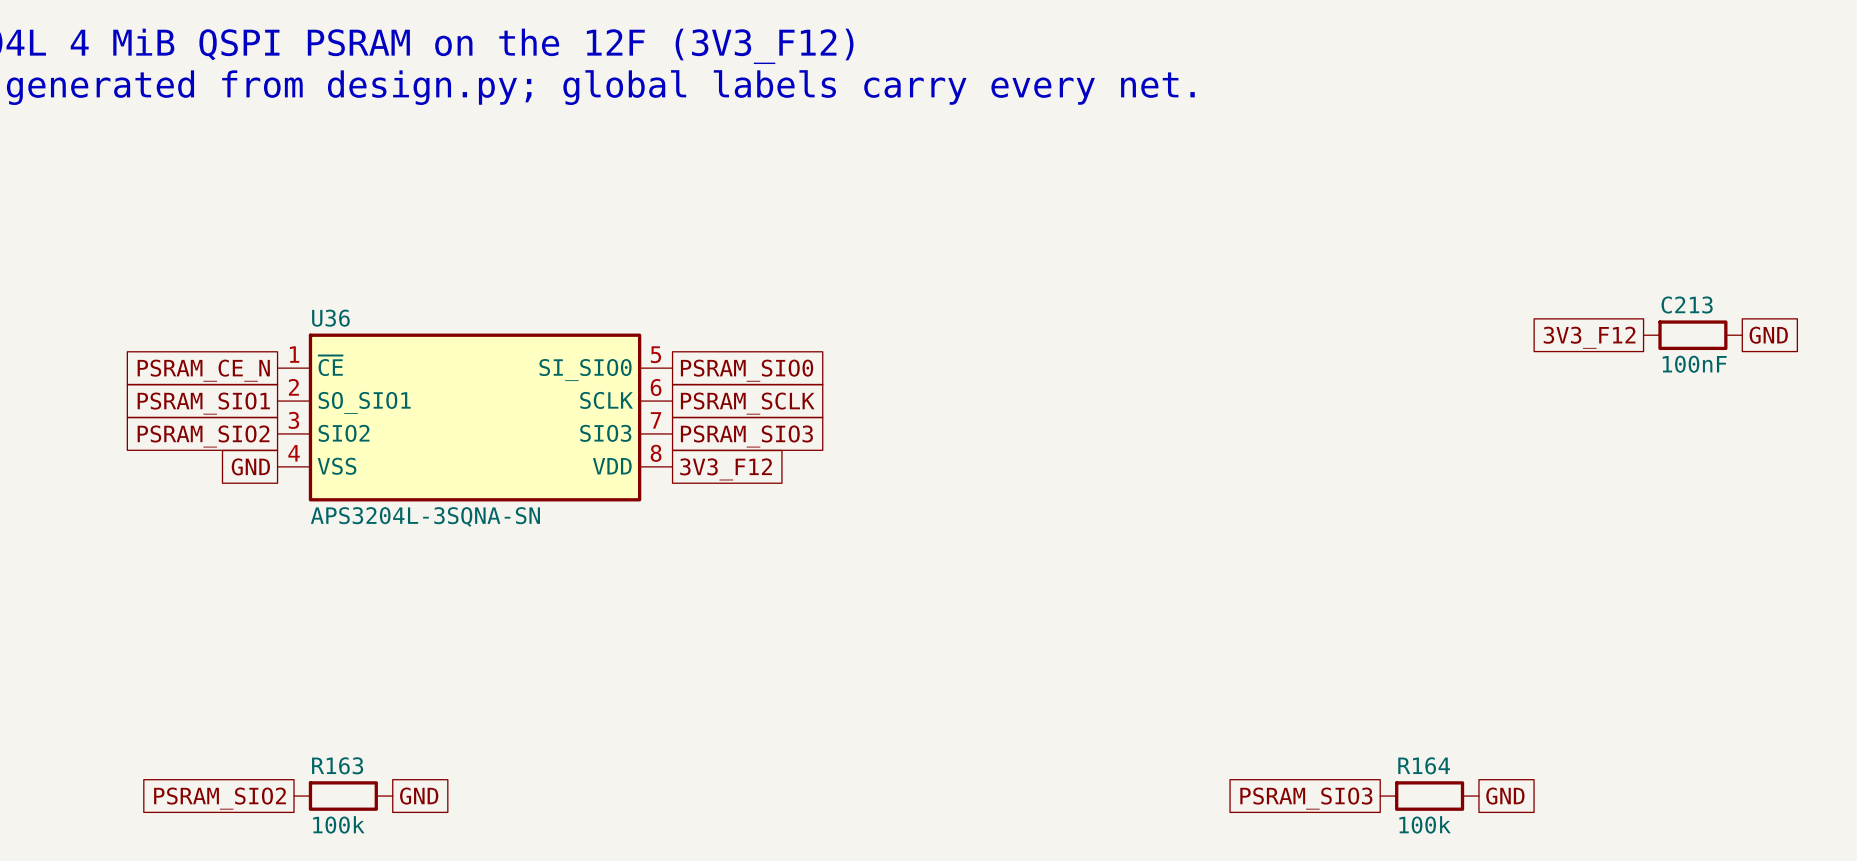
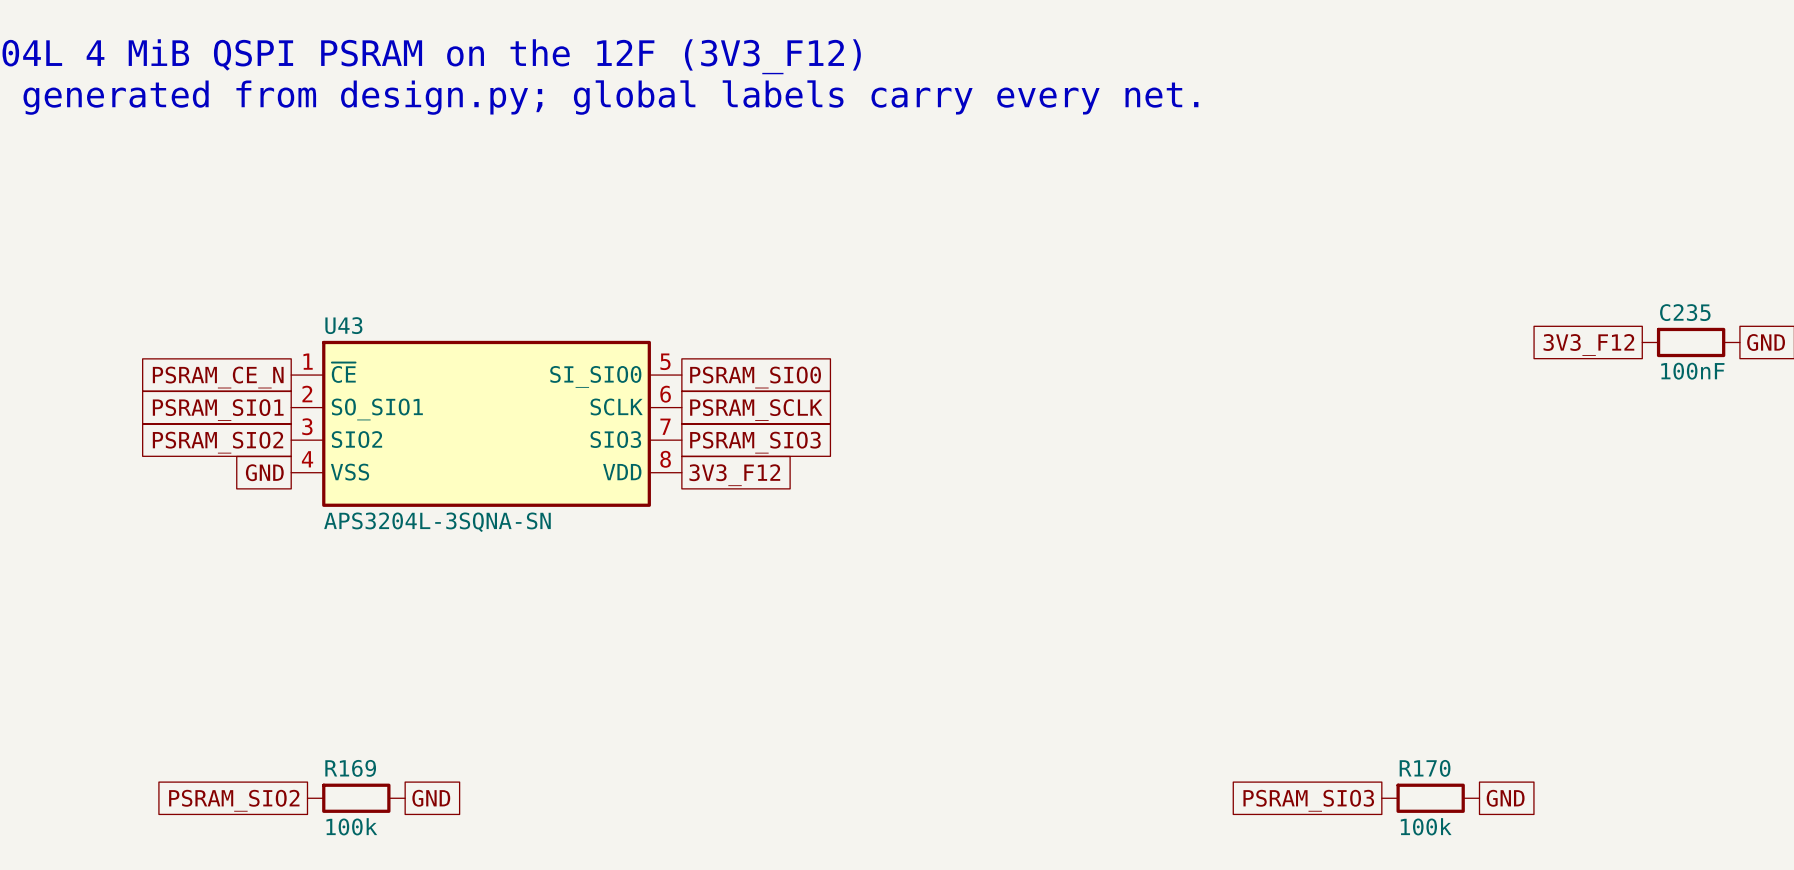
C213 name: C213 (1687, 304) -> C235 (1685, 312)
U36 name: U36 (330, 318) -> U43 (343, 325)
R163 name: R163 (337, 765) -> R169 (350, 768)
R164 name: R164 (1424, 765) -> R170 (1425, 768)

